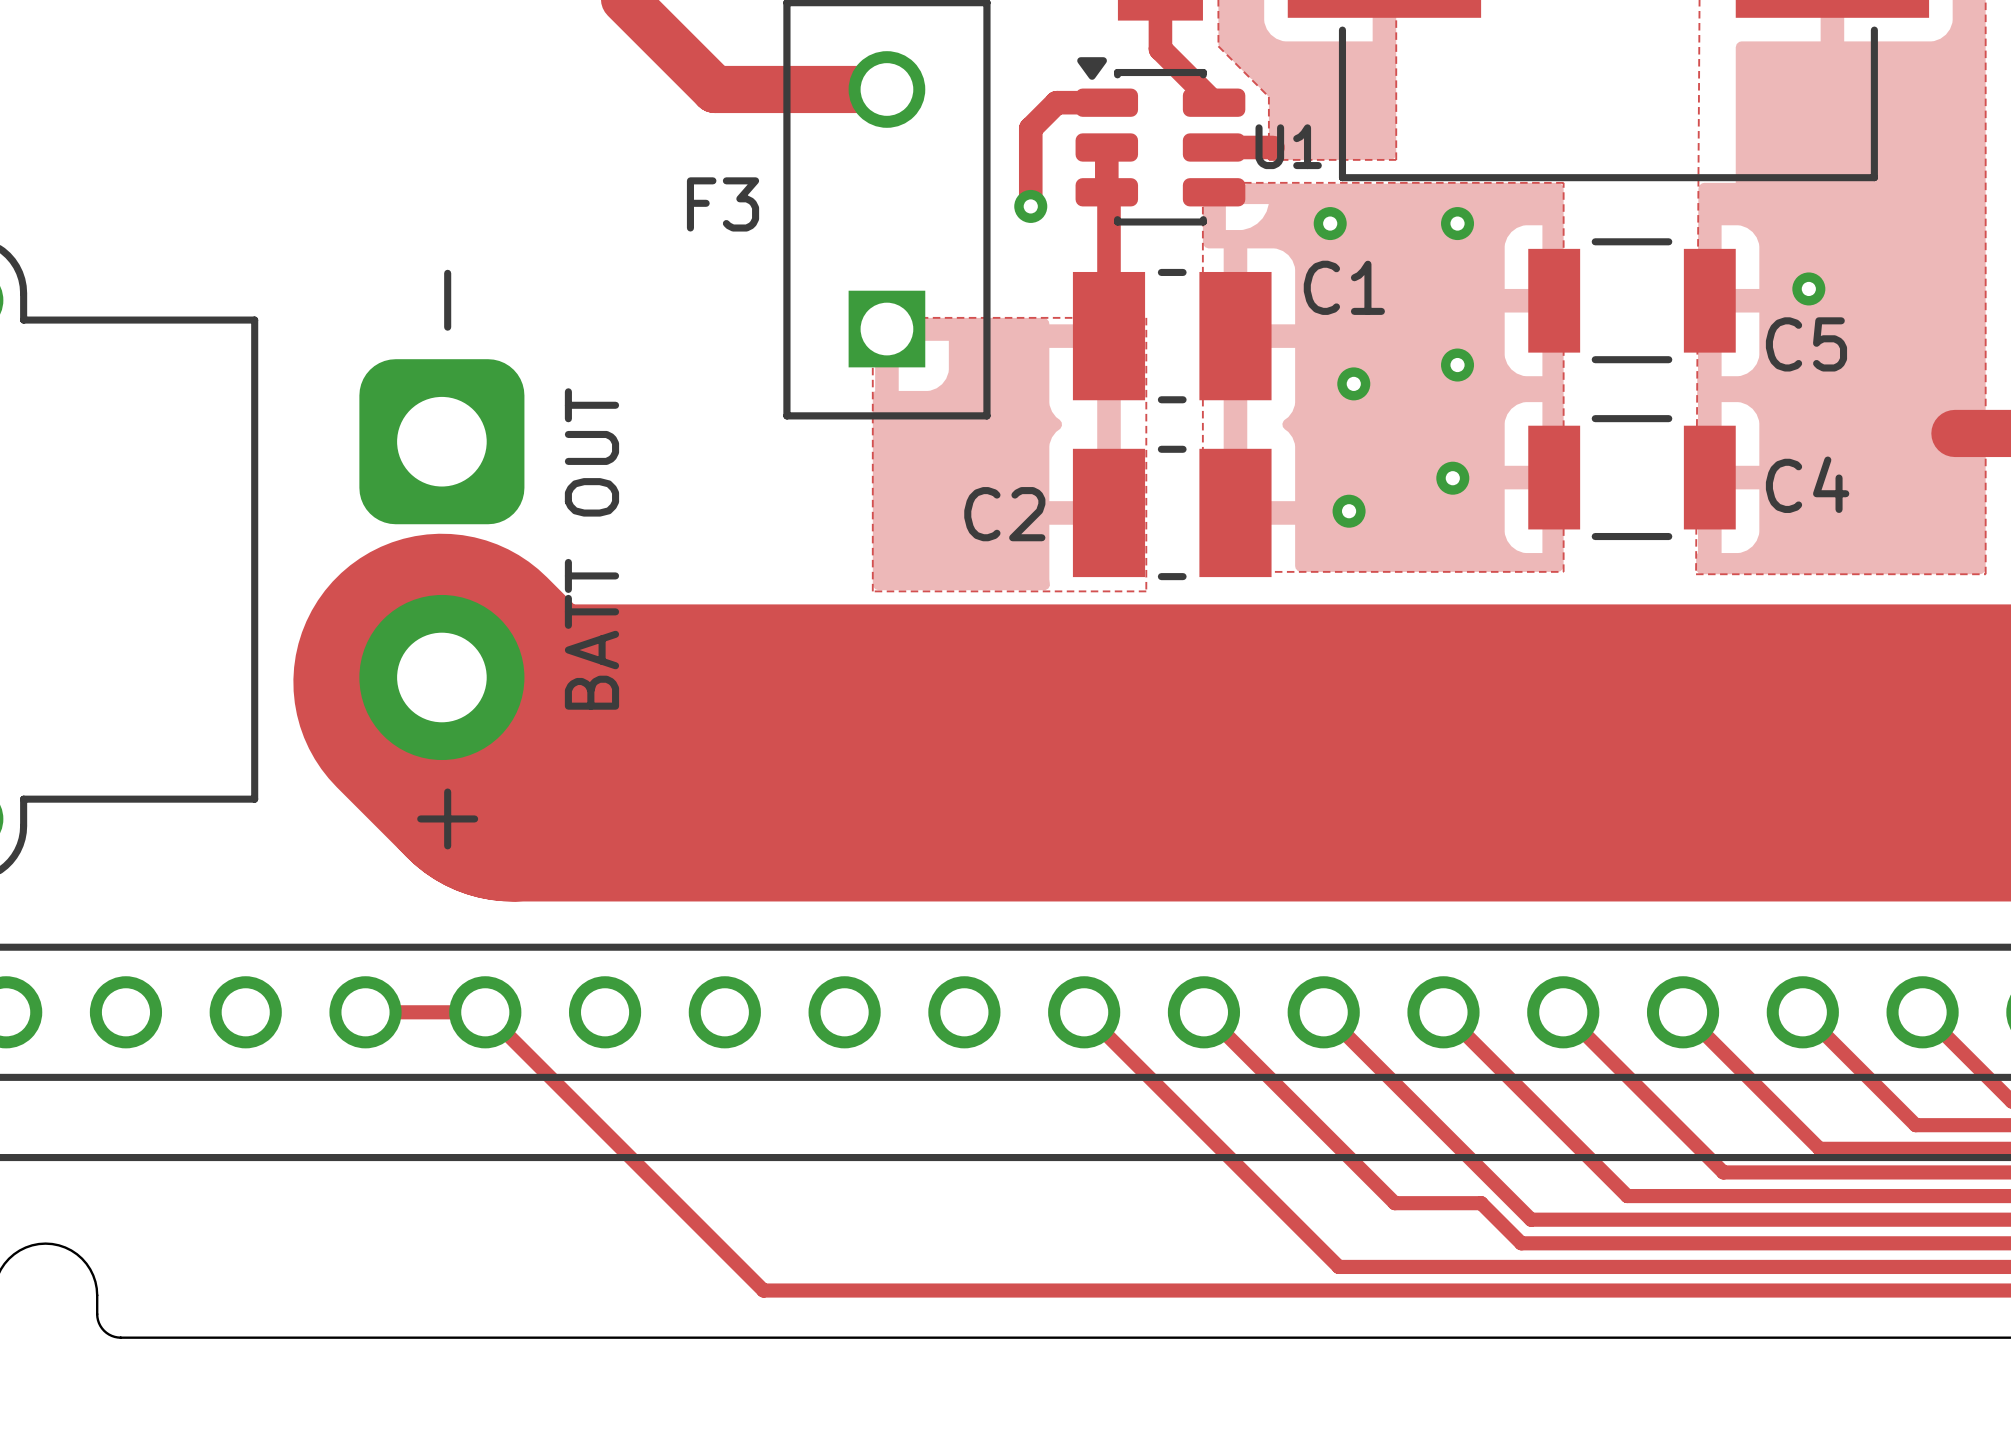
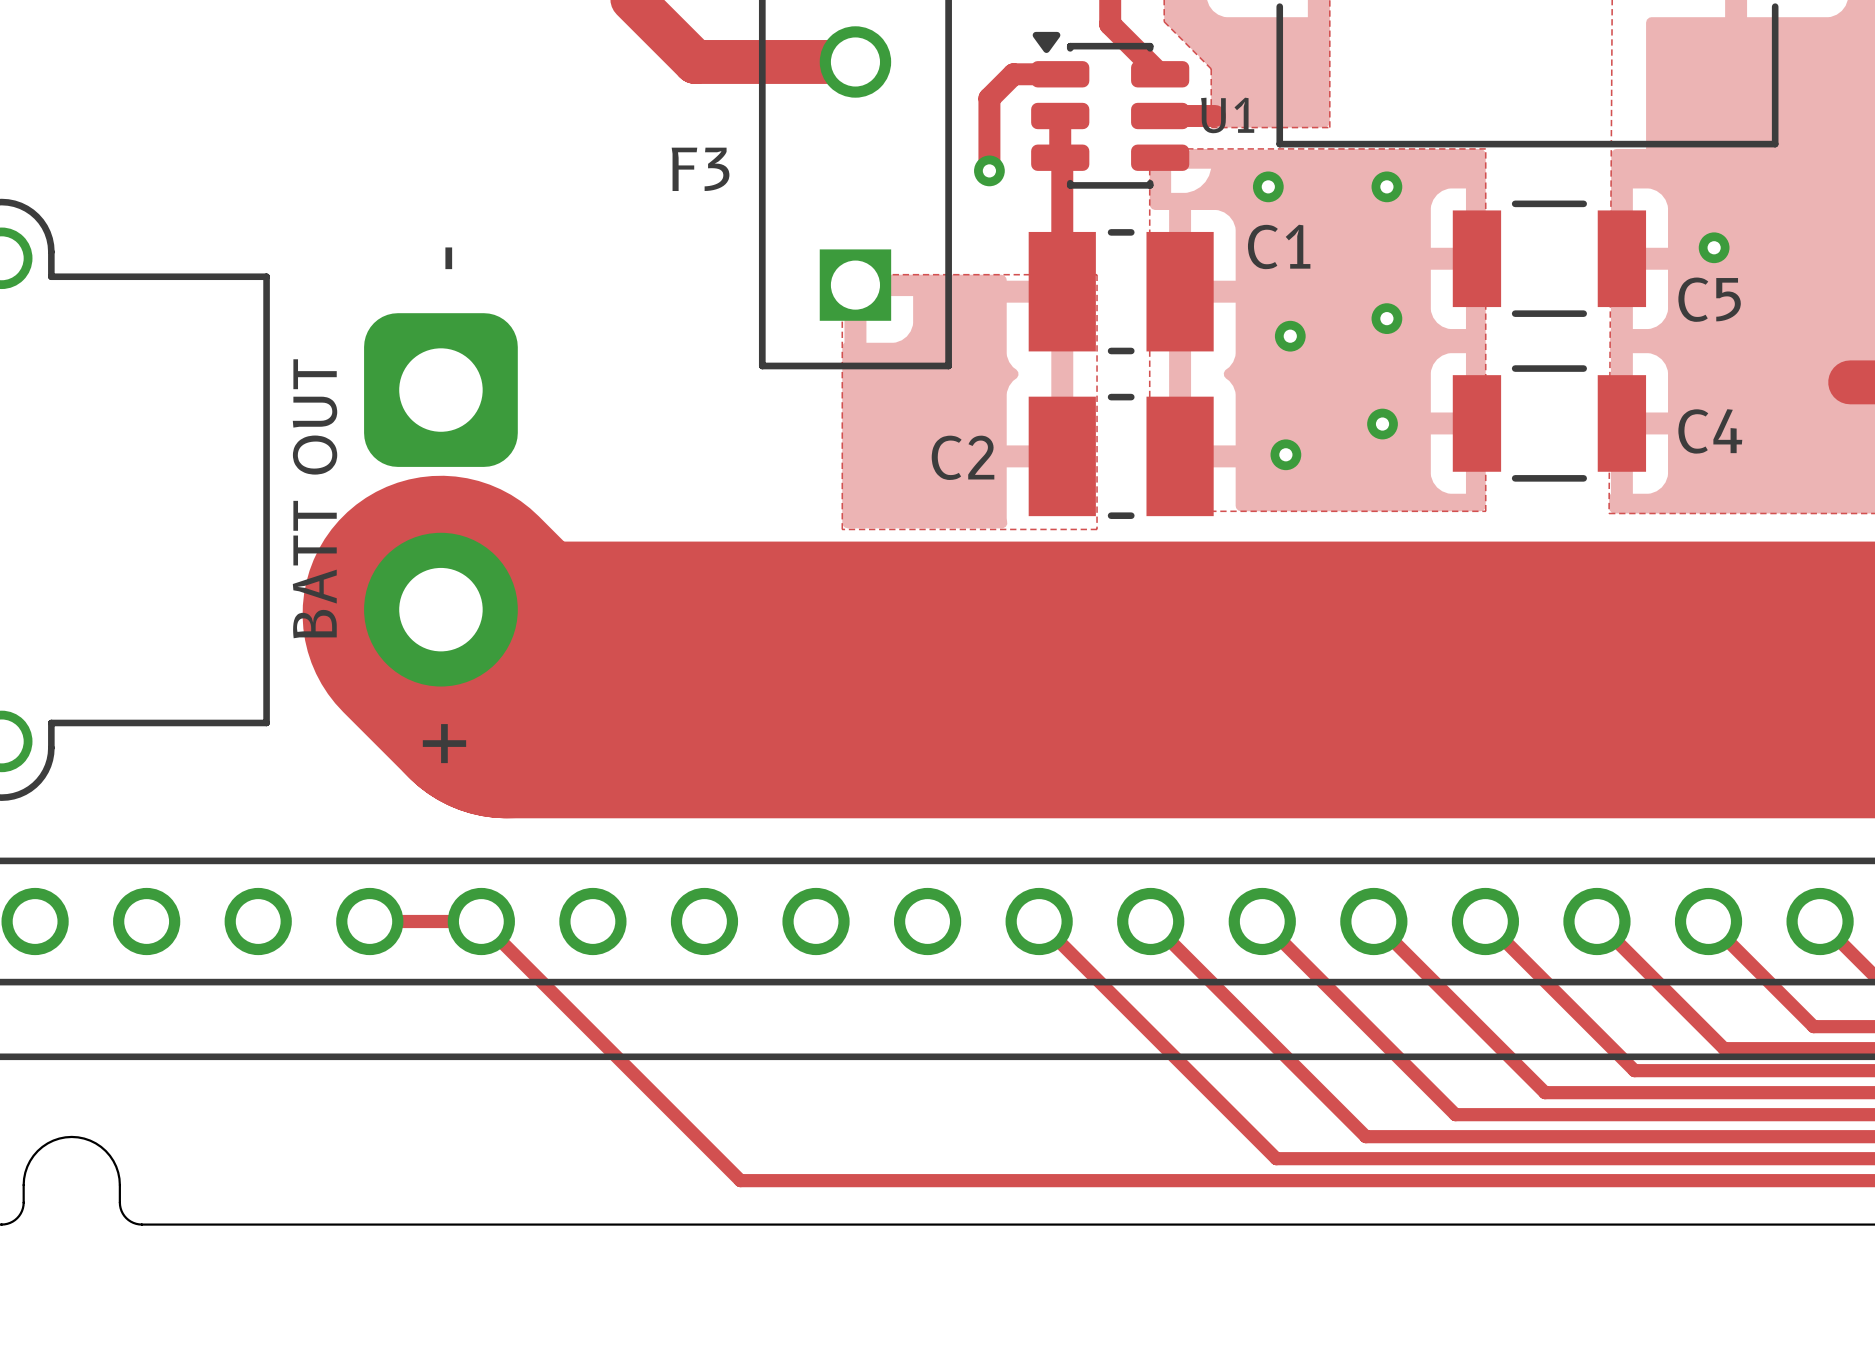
text position: BATT OUT (591, 548) -> BATT OUT (315, 498)
track: (1394, 1203) (1481, 1203) (1521, 1243) -> (1328, 1099) (1365, 1136) (1446, 1136)

